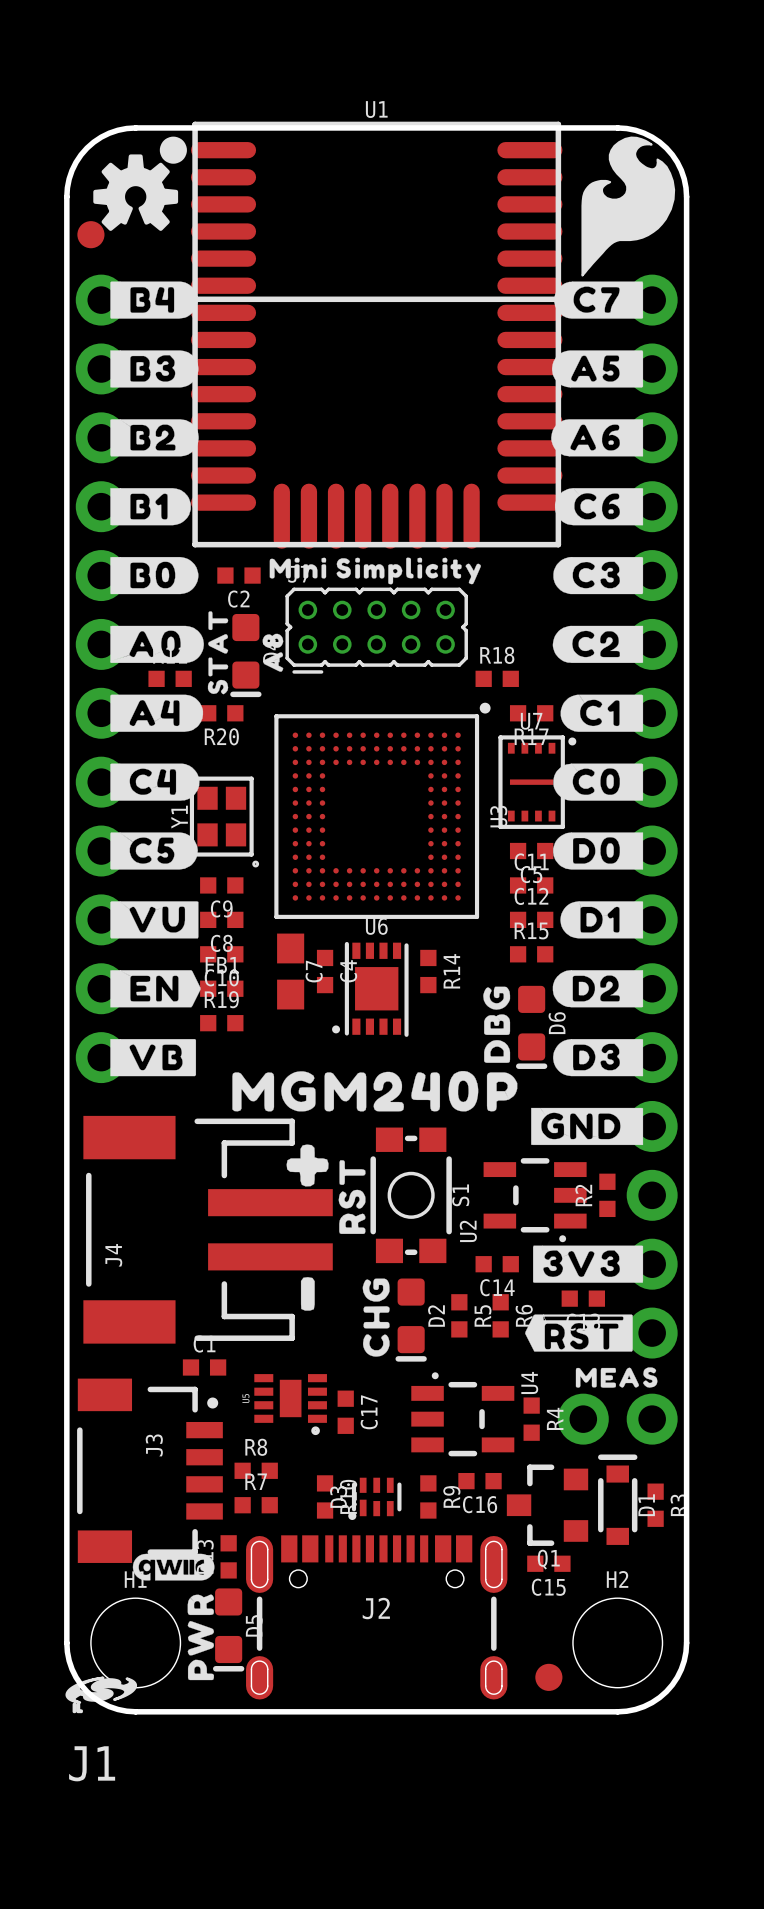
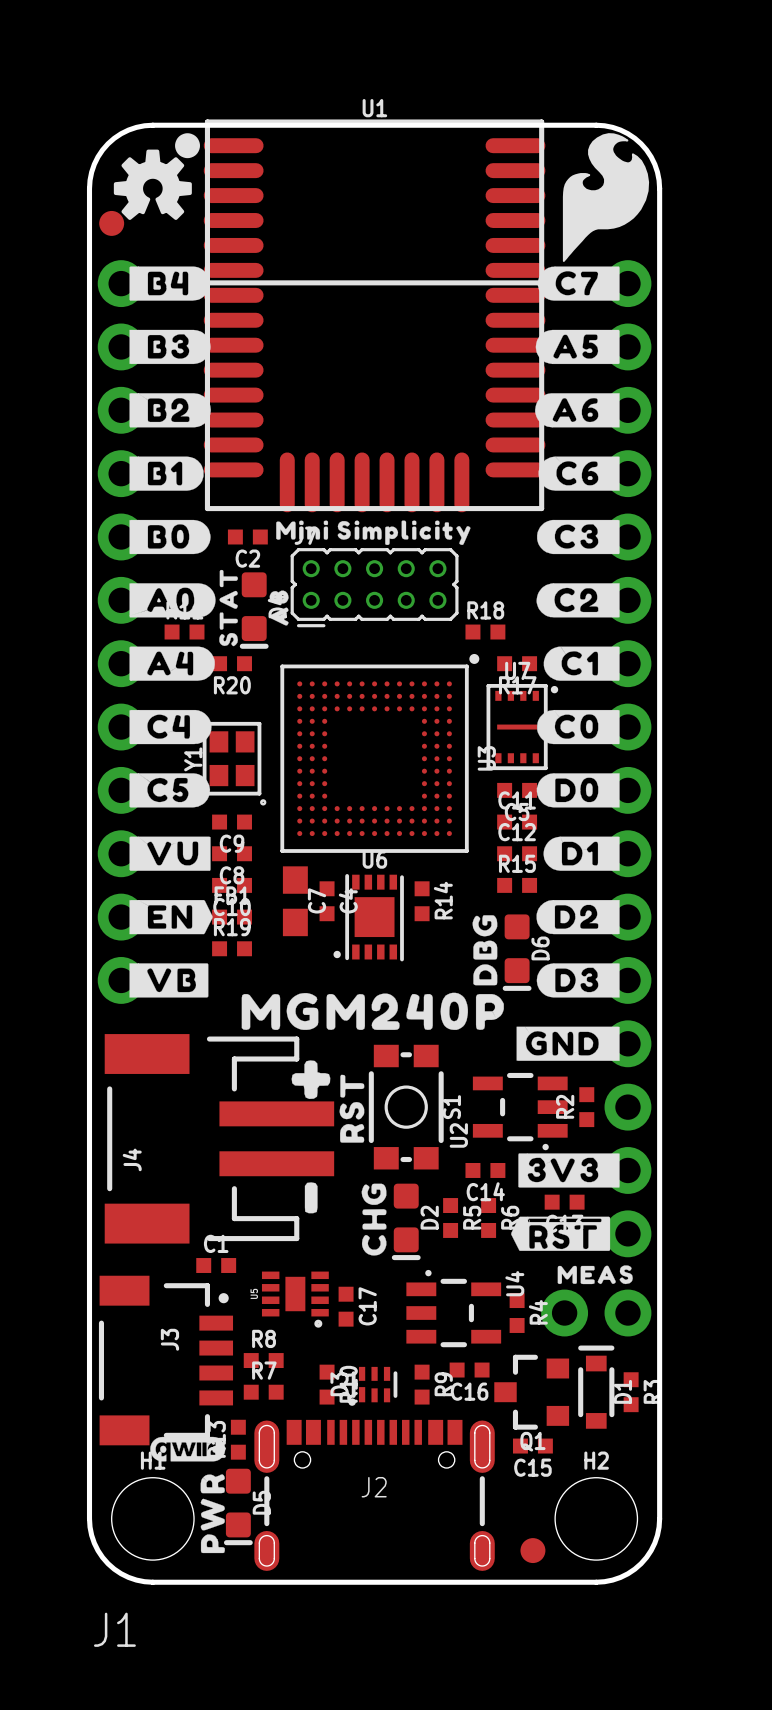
drawing: [65, 1676, 138, 1714] -> none

